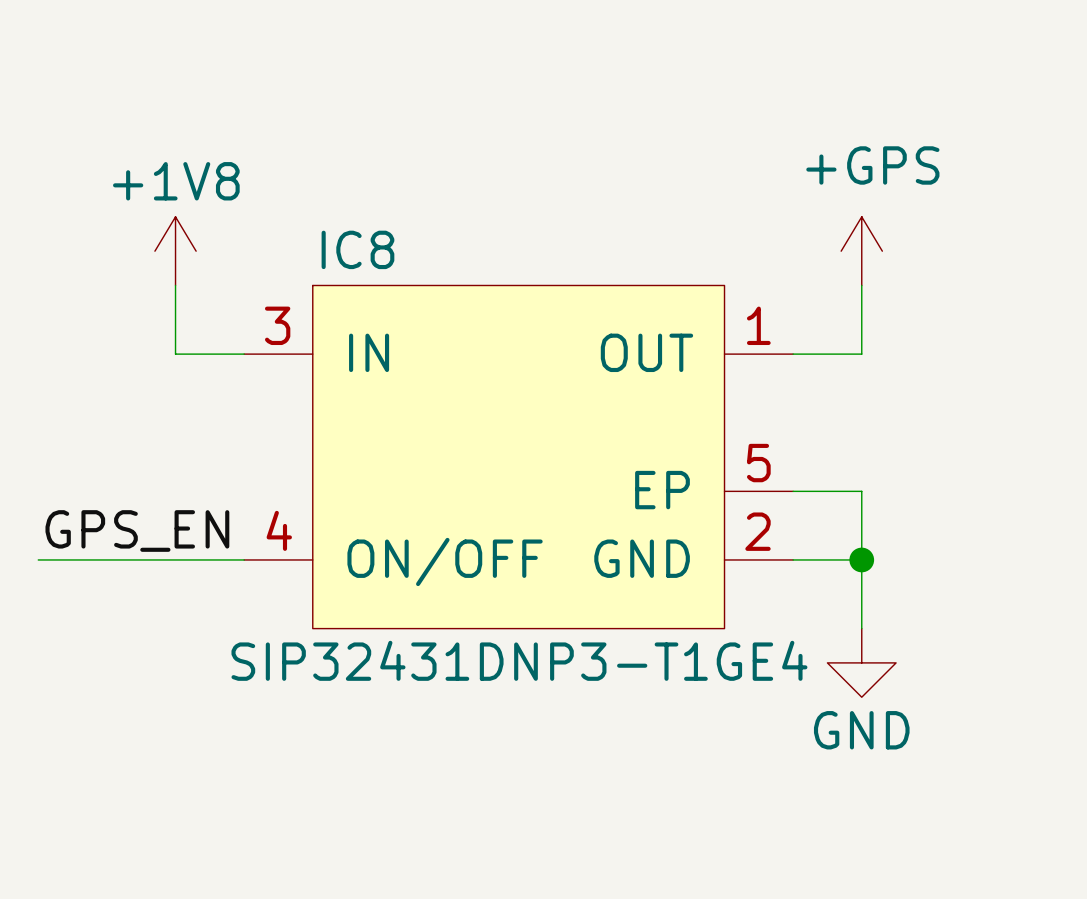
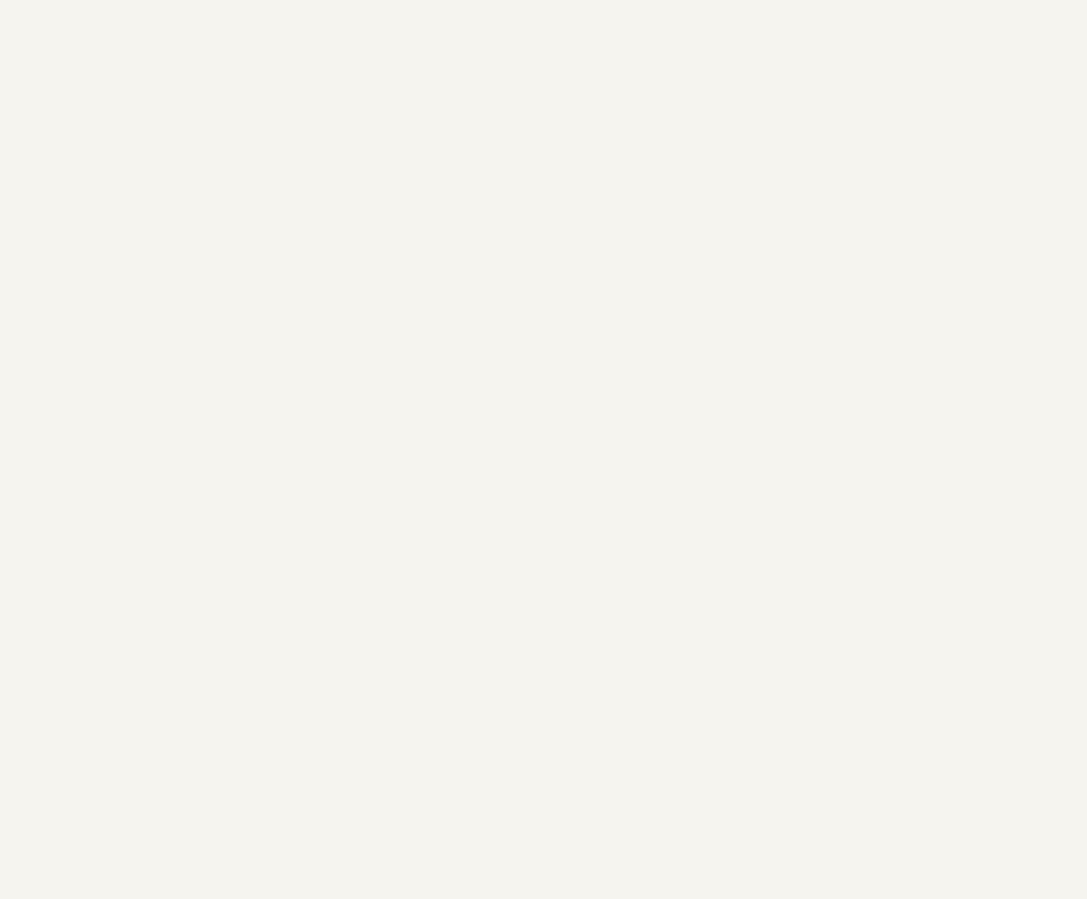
power symbol: +1V8 (175, 251) -> none
power symbol: +GPS (861, 251) -> none
wire: (175, 285) (175, 354) (244, 354) -> none
wire: (861, 285) (861, 354) (793, 354) -> none
IC8: SIP32431DNP3-T1GE4 (518, 457) -> none
wire: (793, 491) (861, 491) (861, 628) -> none
label: GPS_EN (137, 530) -> none
wire: (38, 559) (244, 559) -> none
wire: (793, 559) (861, 559) -> none
junction: (861, 559) -> none
power symbol: GND (861, 662) -> none

